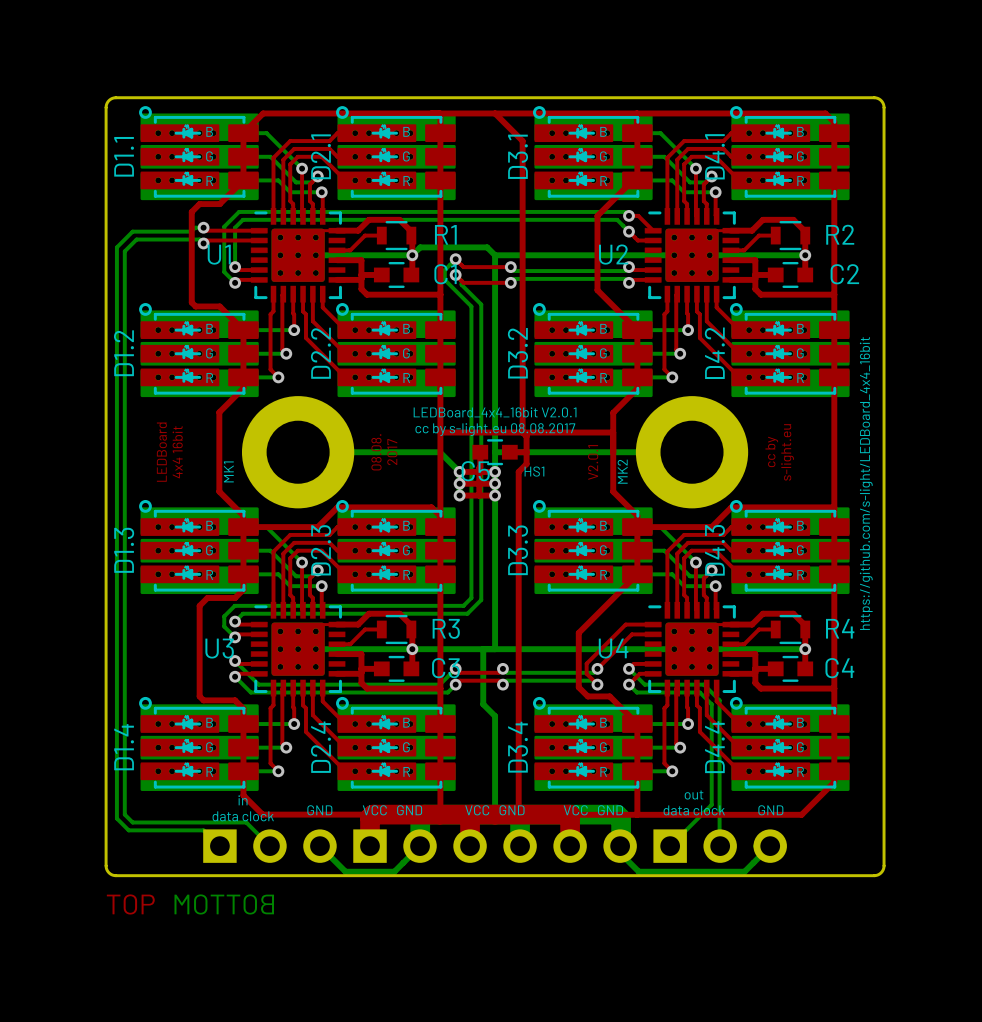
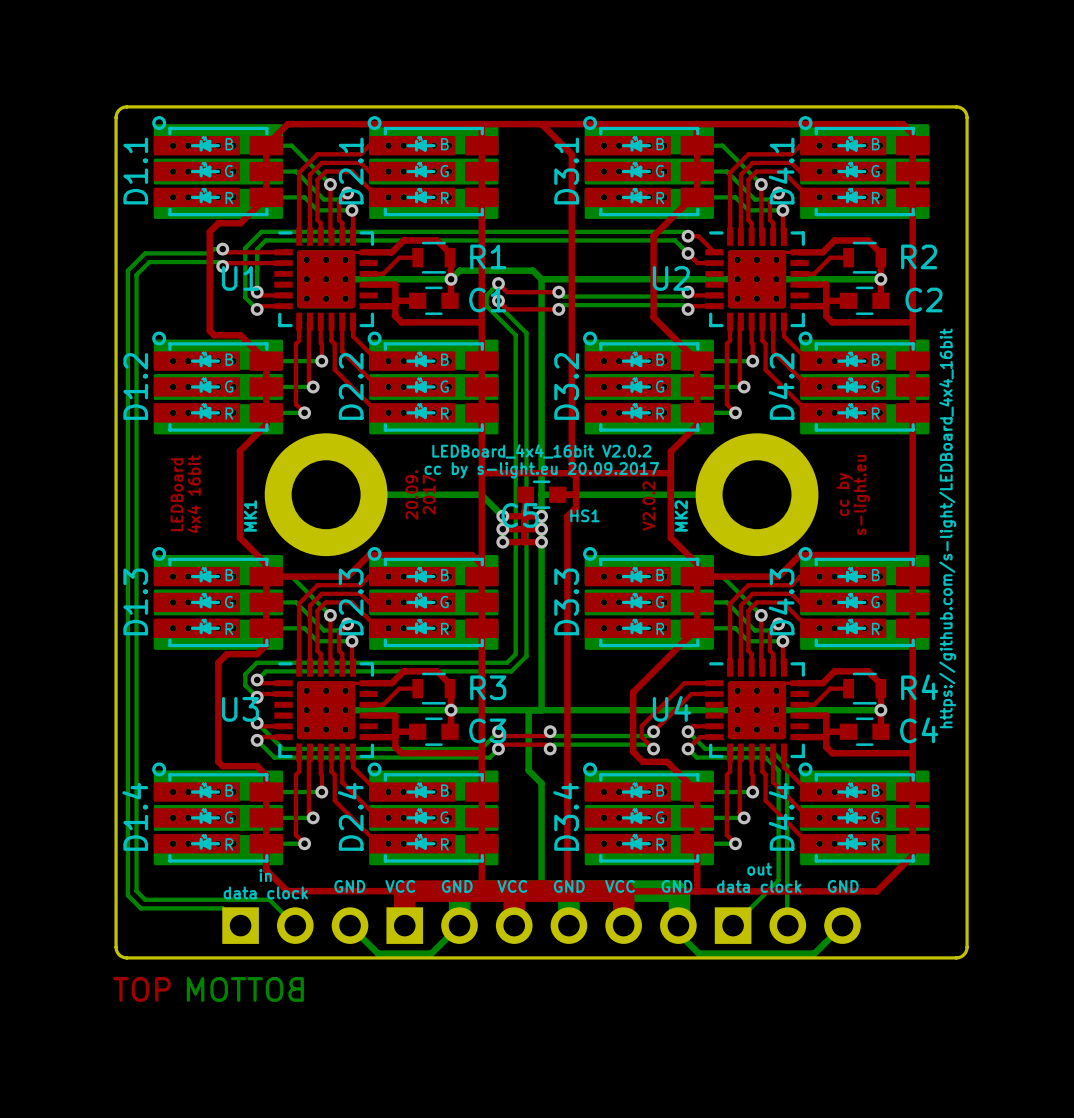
text: LEDBoard_4x4_16bit V2.0.1 (495, 412) -> LEDBoard_4x4_16bit V2.0.2 (541, 451)
text: cc by s-light.eu 08.08.2017 (495, 429) -> cc by s-light.eu 20.09.2017 (541, 470)
text: 08.08. (376, 452) -> 20.09. (411, 494)
text: V2.0.1 (593, 462) -> V2.0.2 (648, 506)

